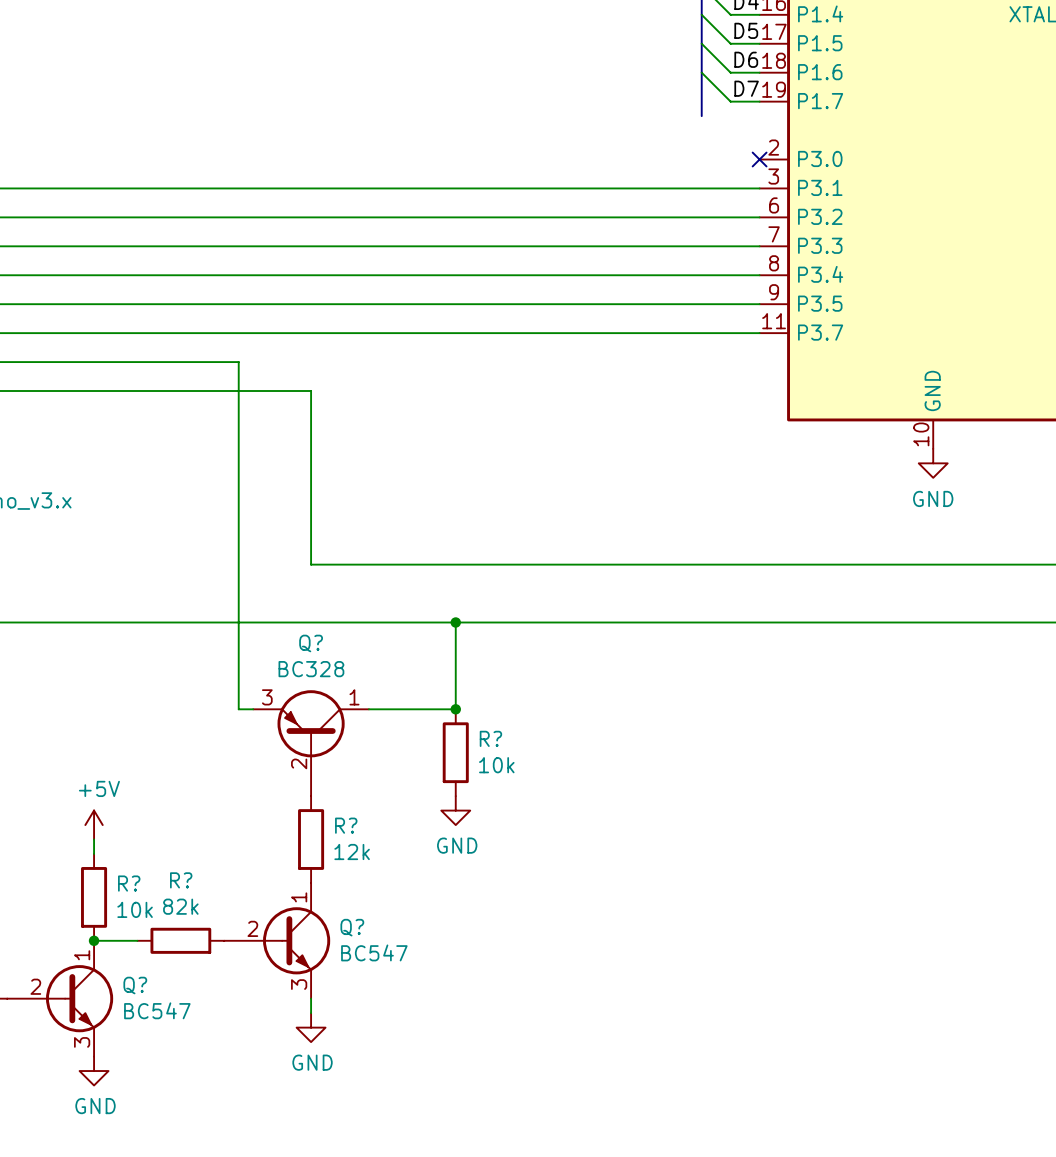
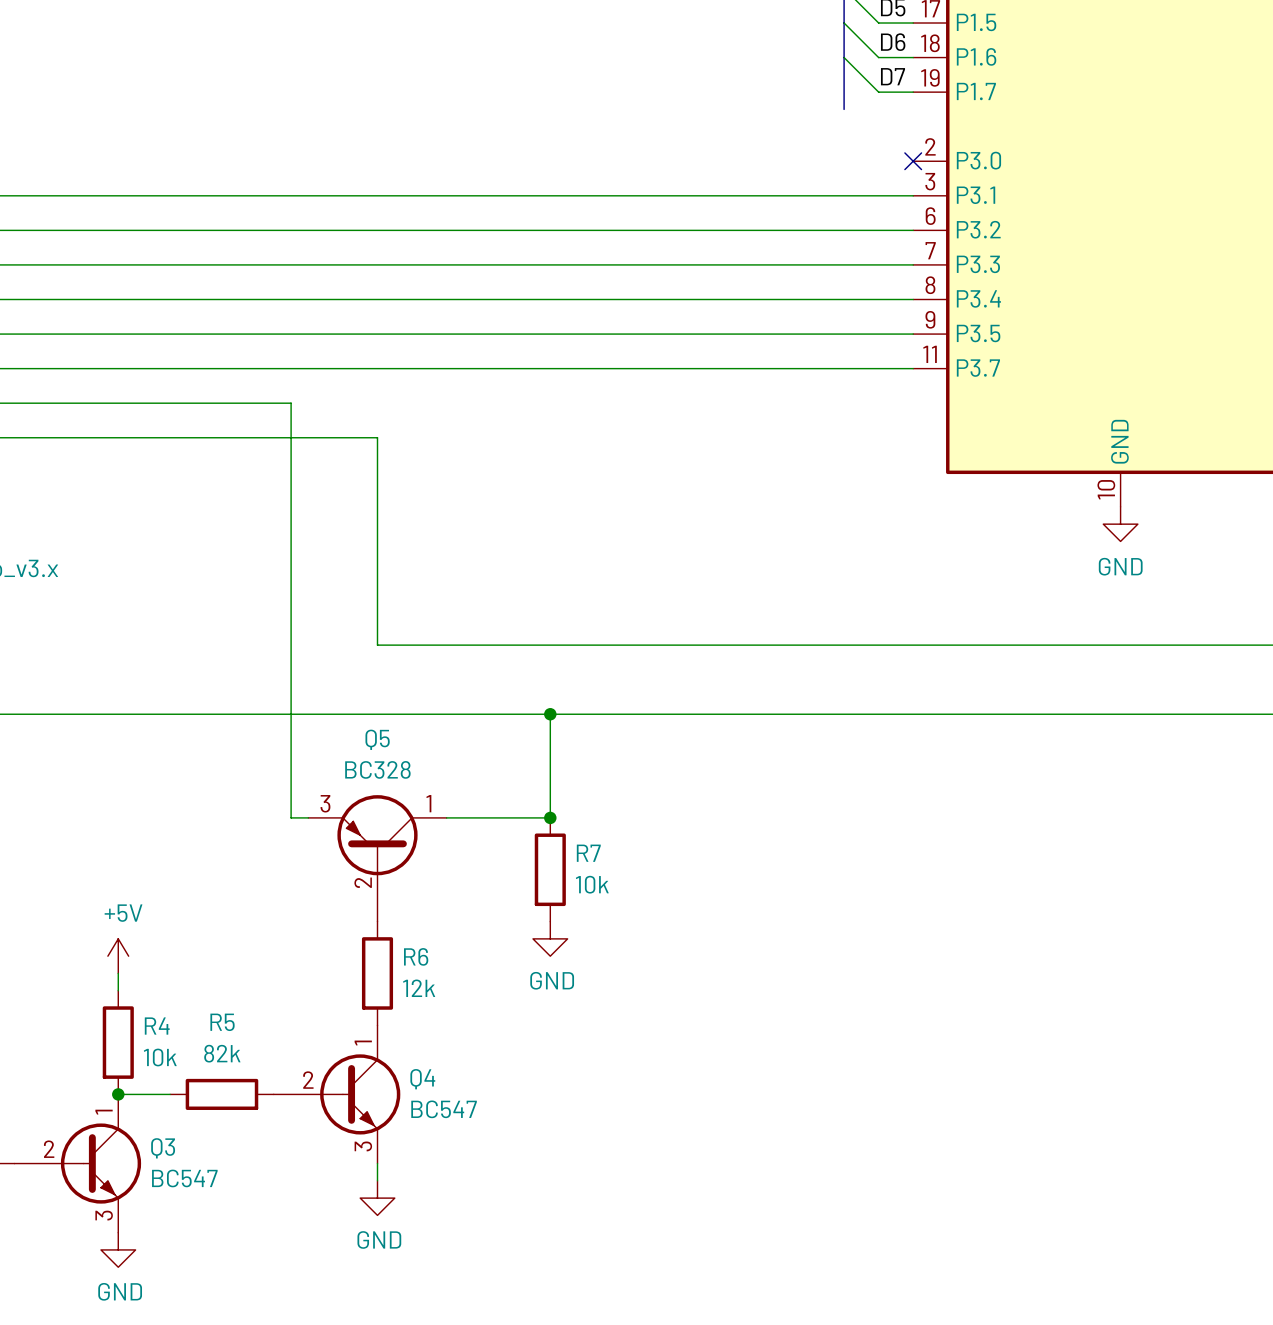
Q? name: Q? (311, 643) -> Q5 (377, 739)
R? name: R? (490, 738) -> R7 (588, 853)
R? name: R? (346, 825) -> R6 (416, 956)
R? name: R? (181, 880) -> R5 (222, 1022)
R? name: R? (129, 883) -> R4 (157, 1026)
Q? name: Q? (352, 927) -> Q4 (422, 1079)
Q? name: Q? (135, 985) -> Q3 (163, 1148)

